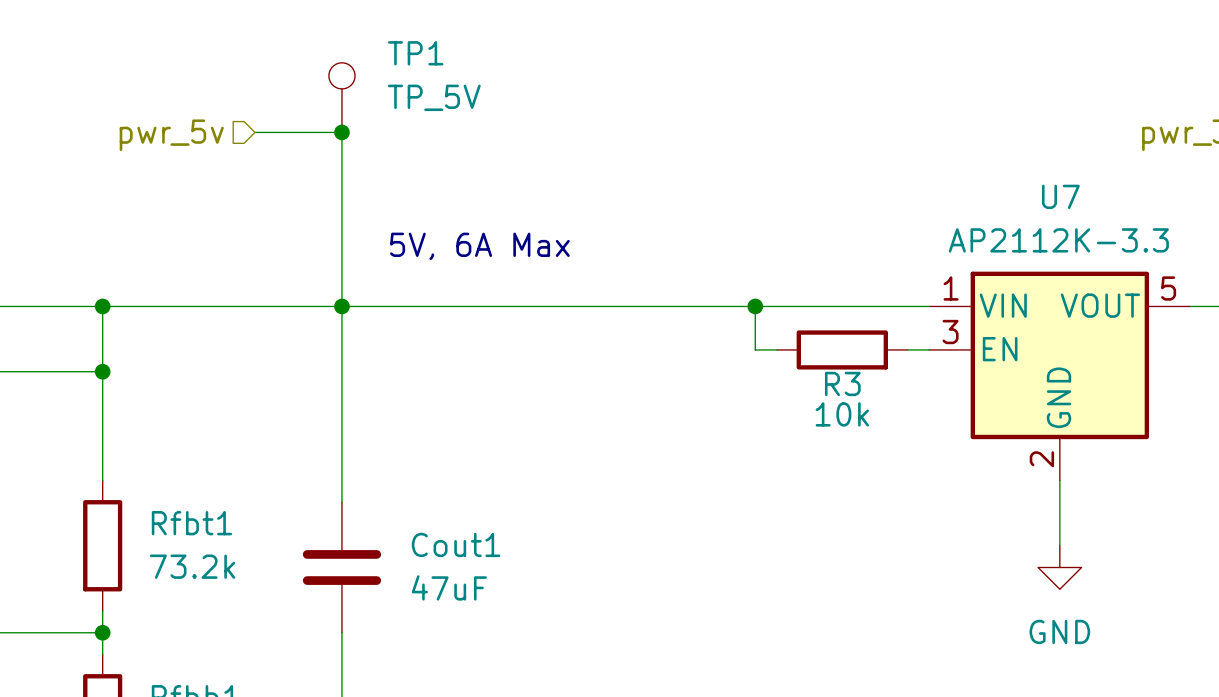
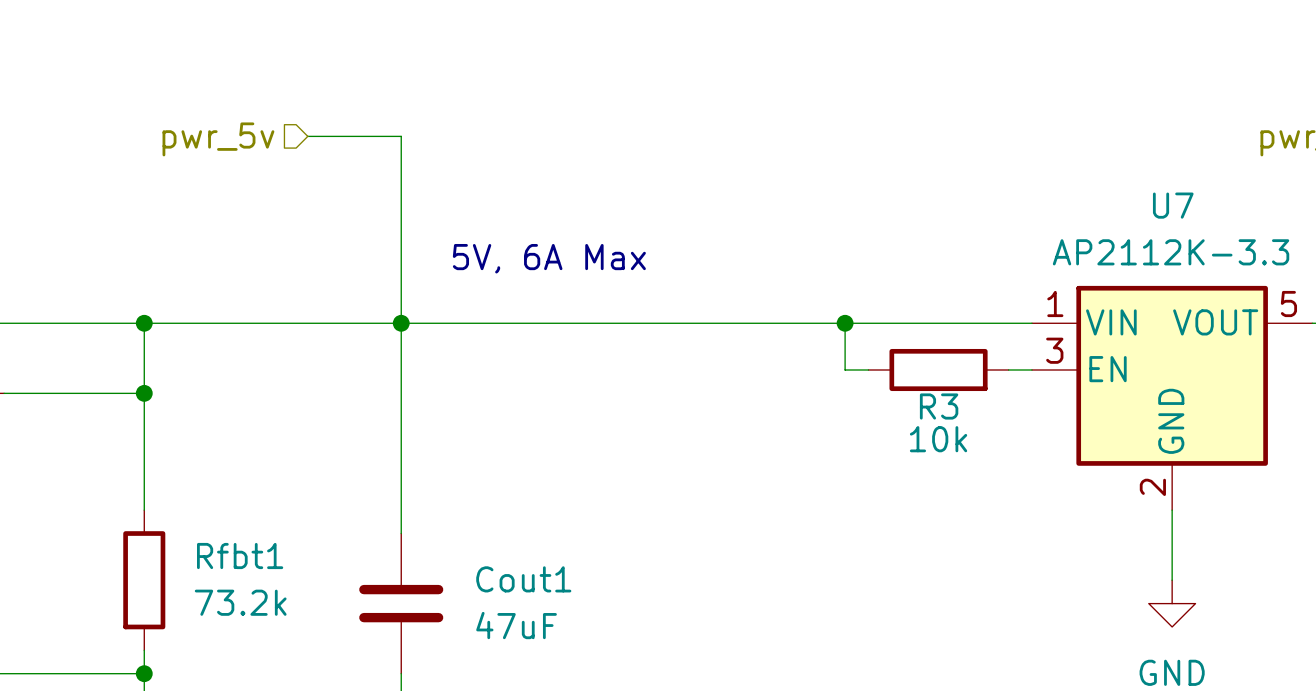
TP1: TP_5V (341, 97) -> none
junction: (341, 132) -> none

